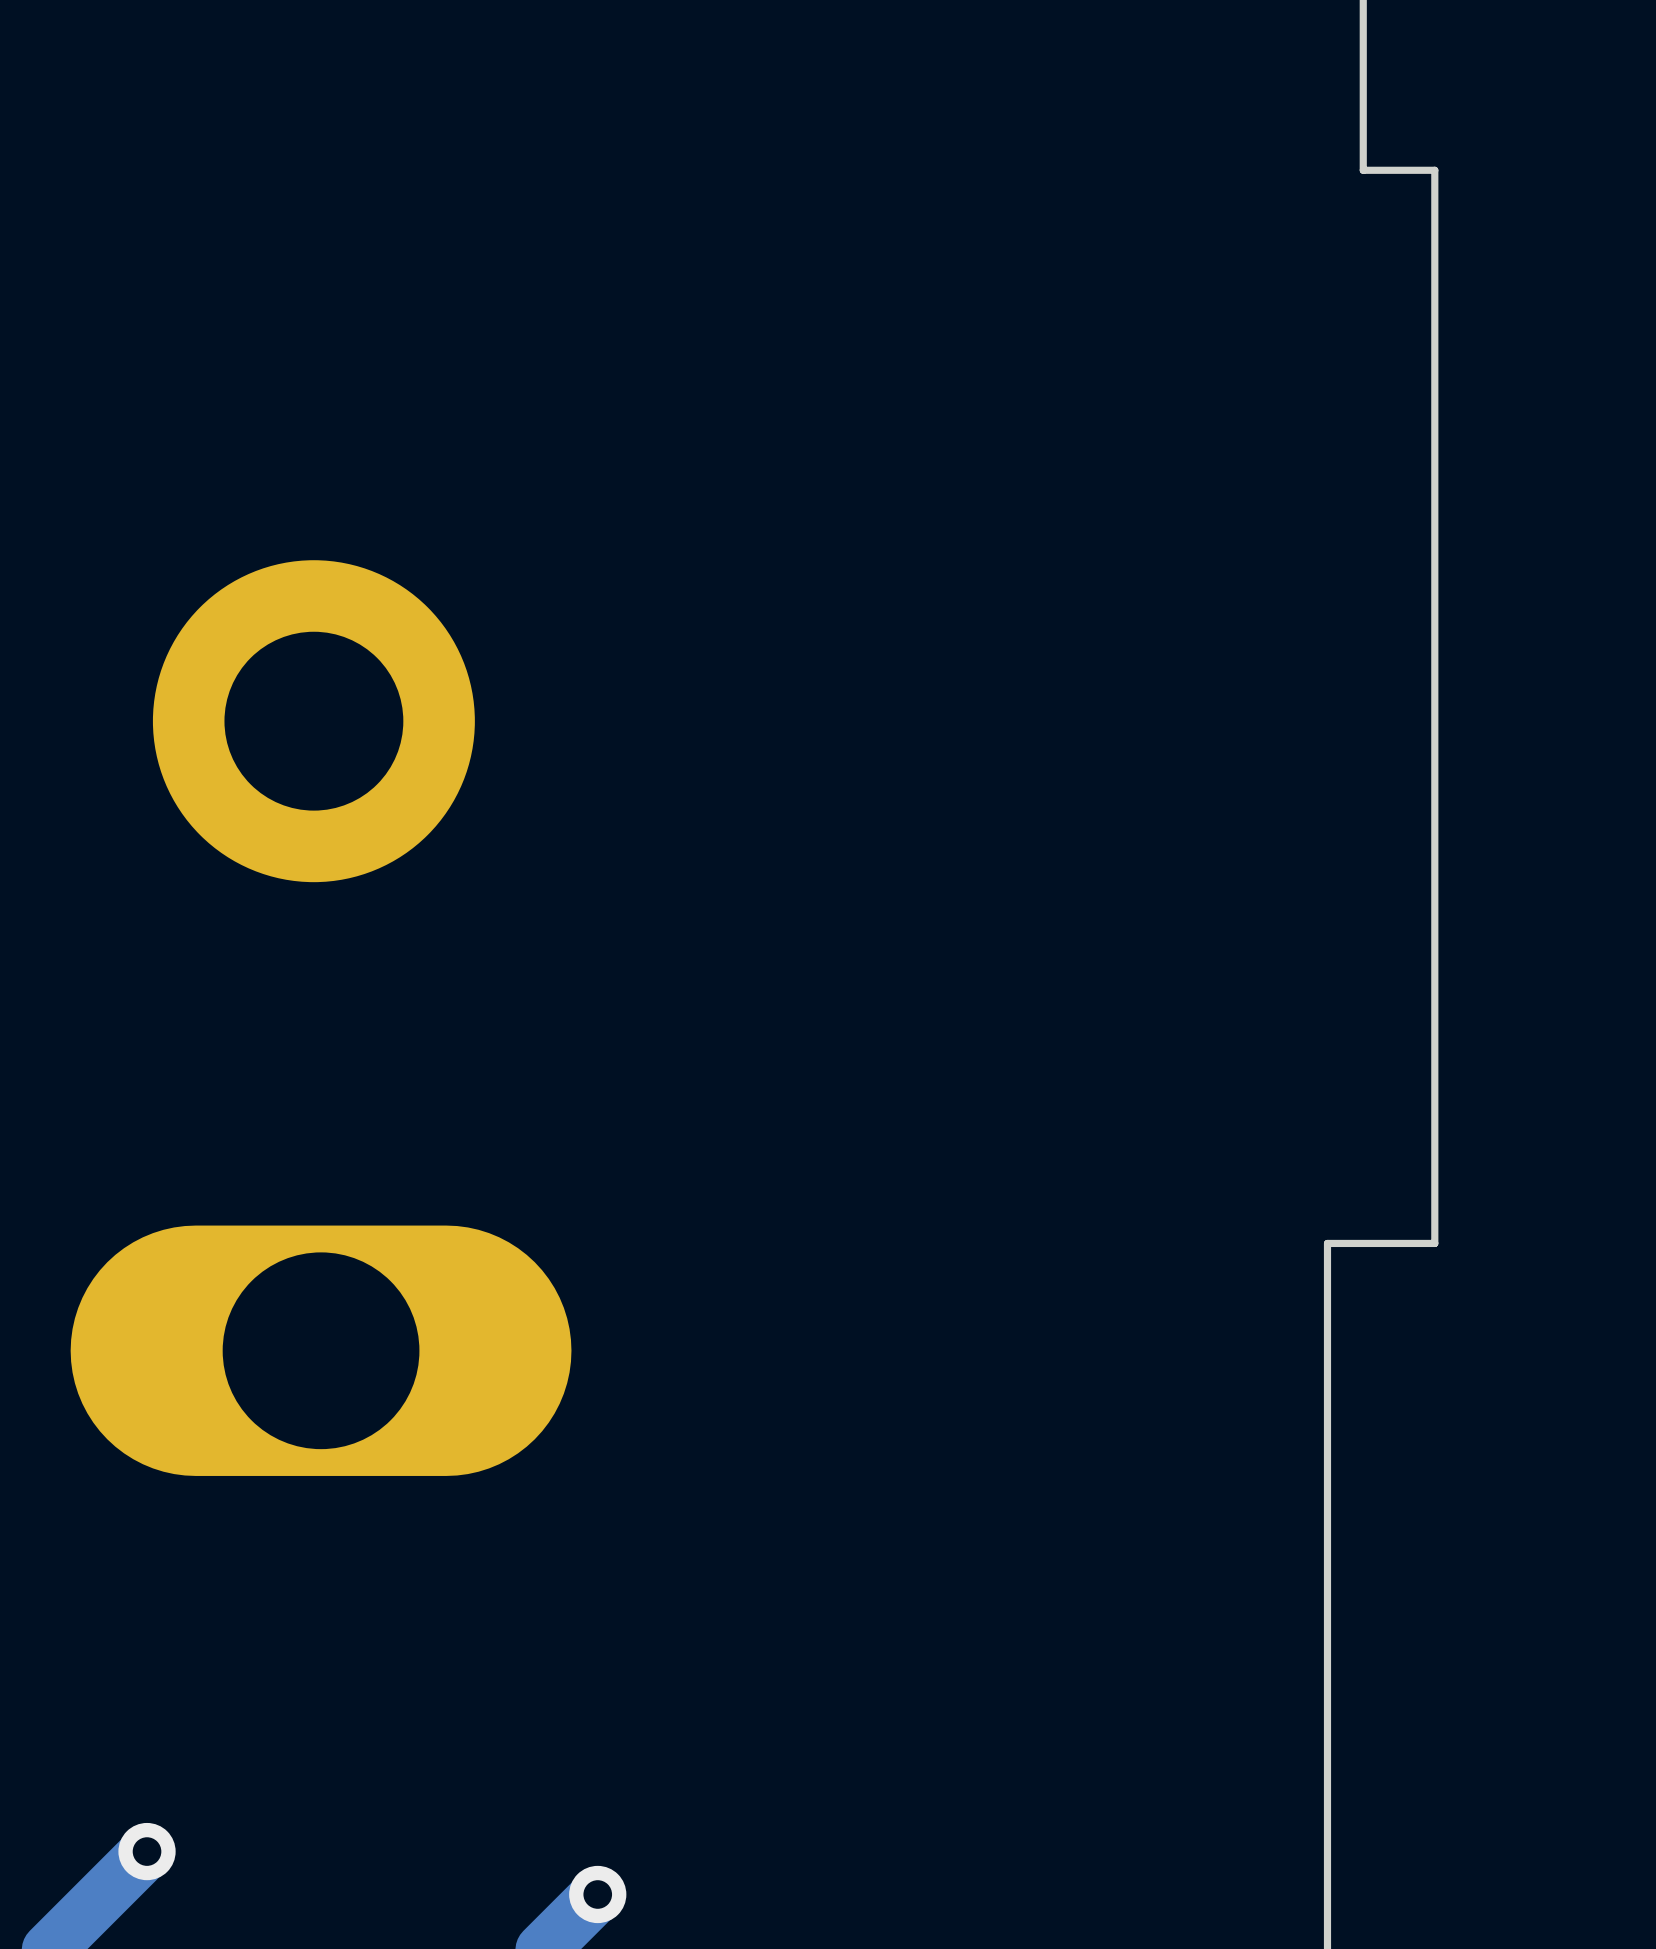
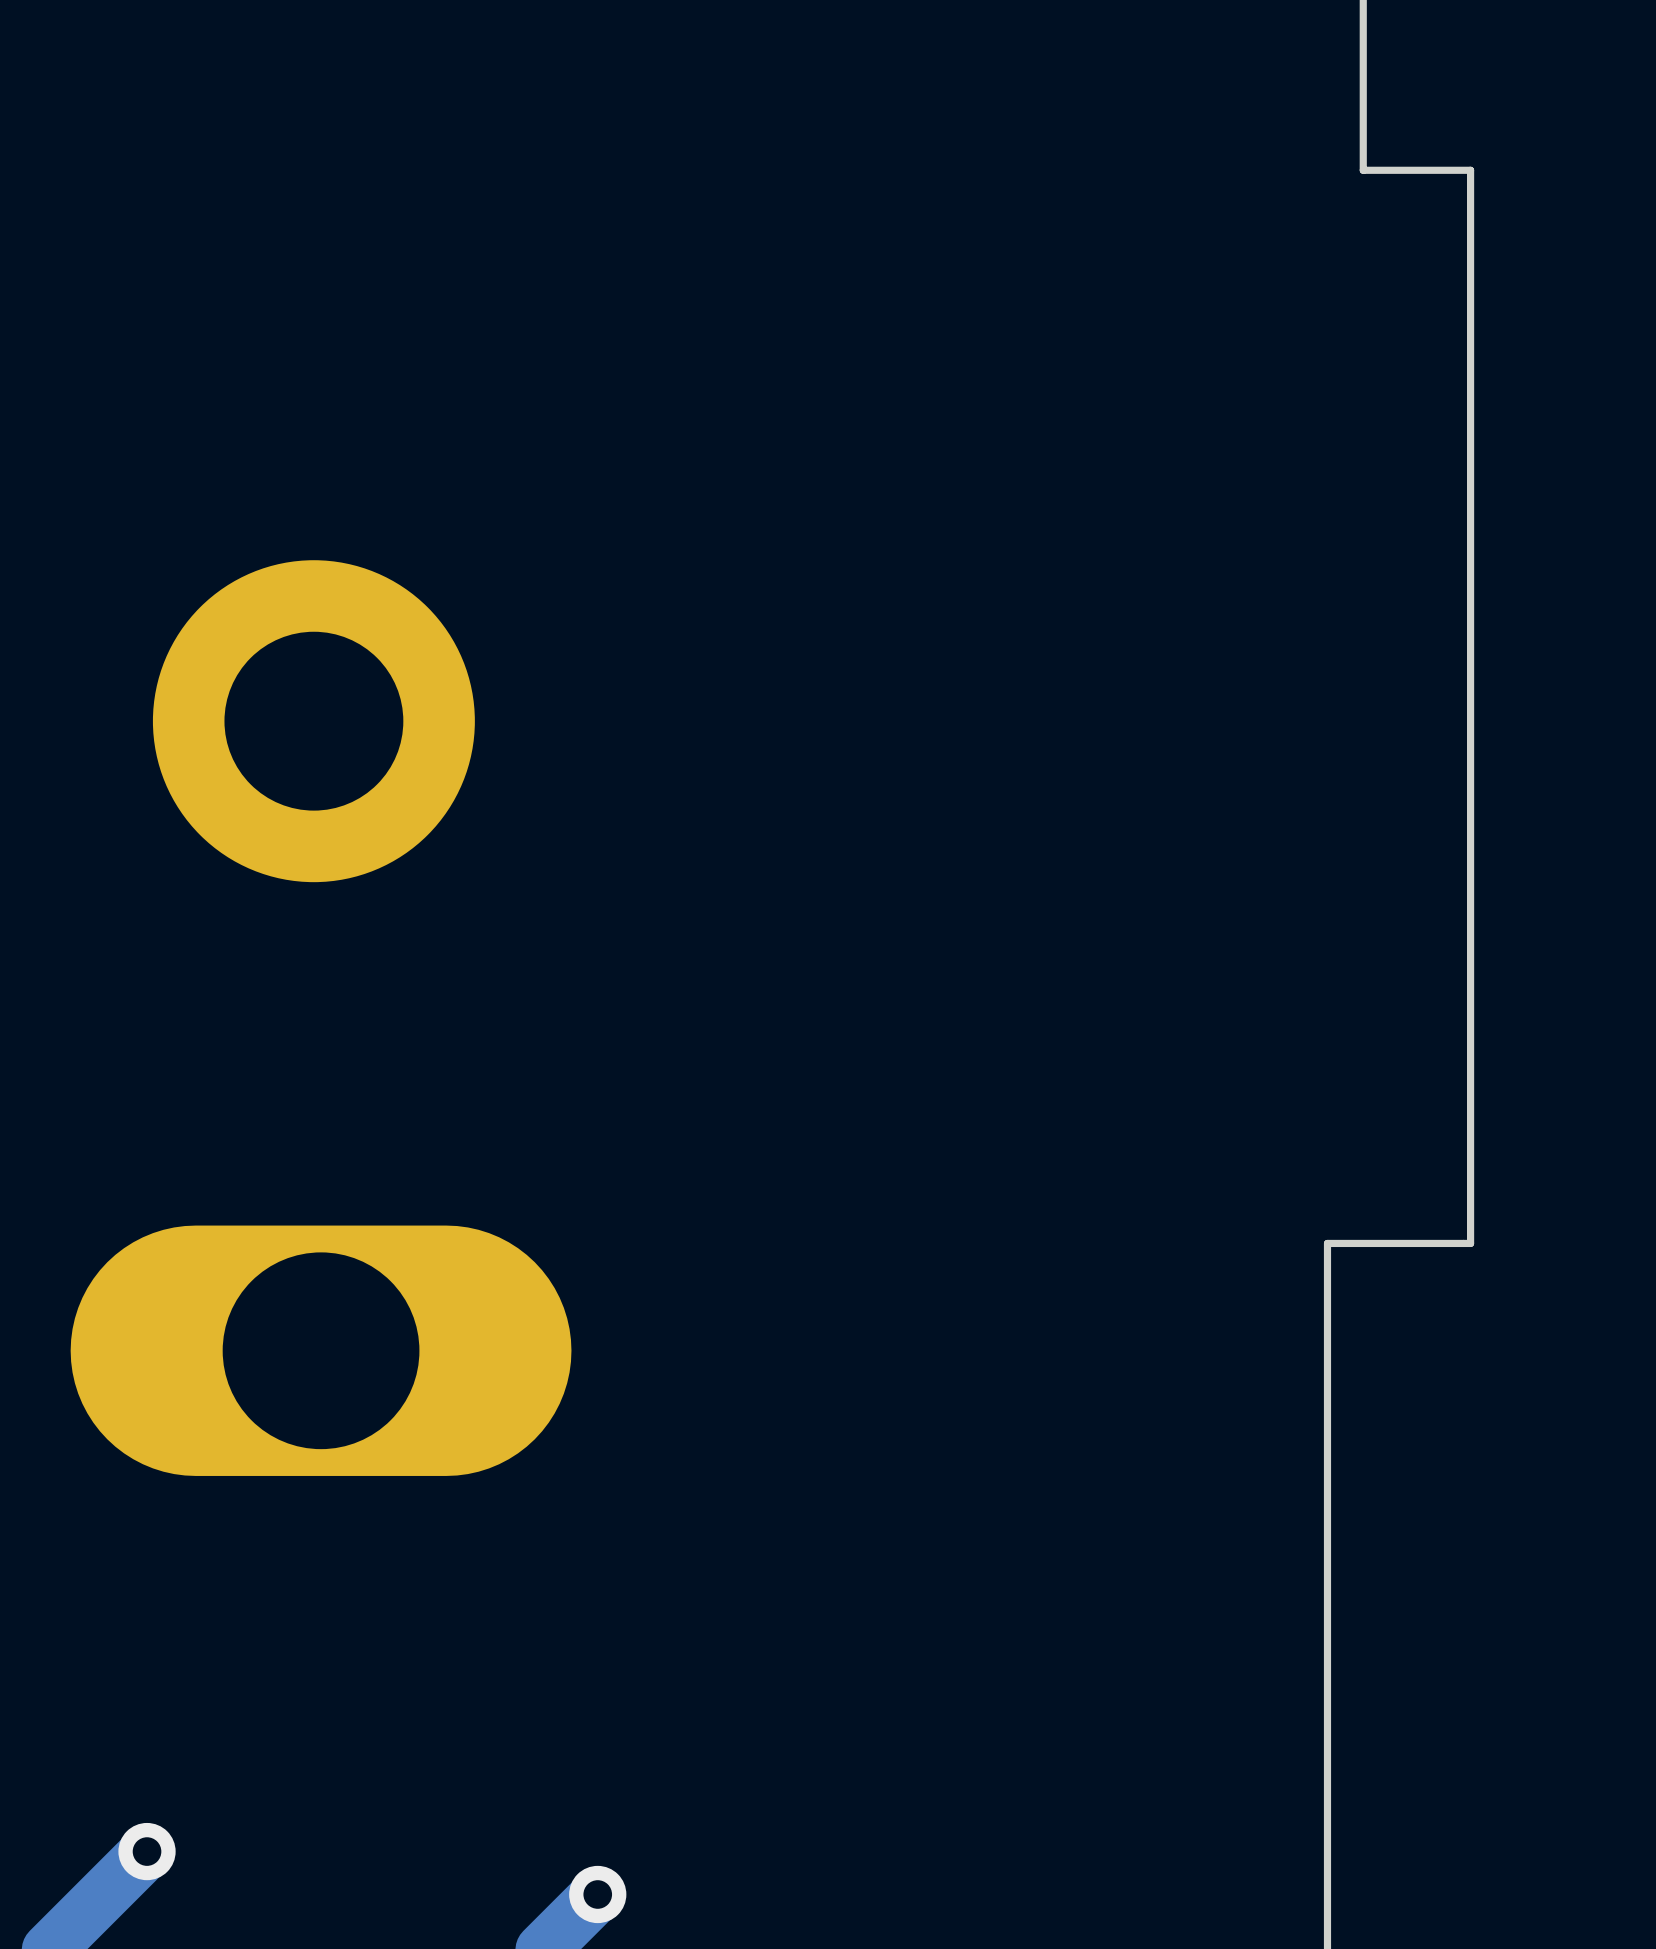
board edge: (1434, 170) (1434, 1243) -> (1434, 170) (1470, 170) (1470, 1243) (1434, 1243)

